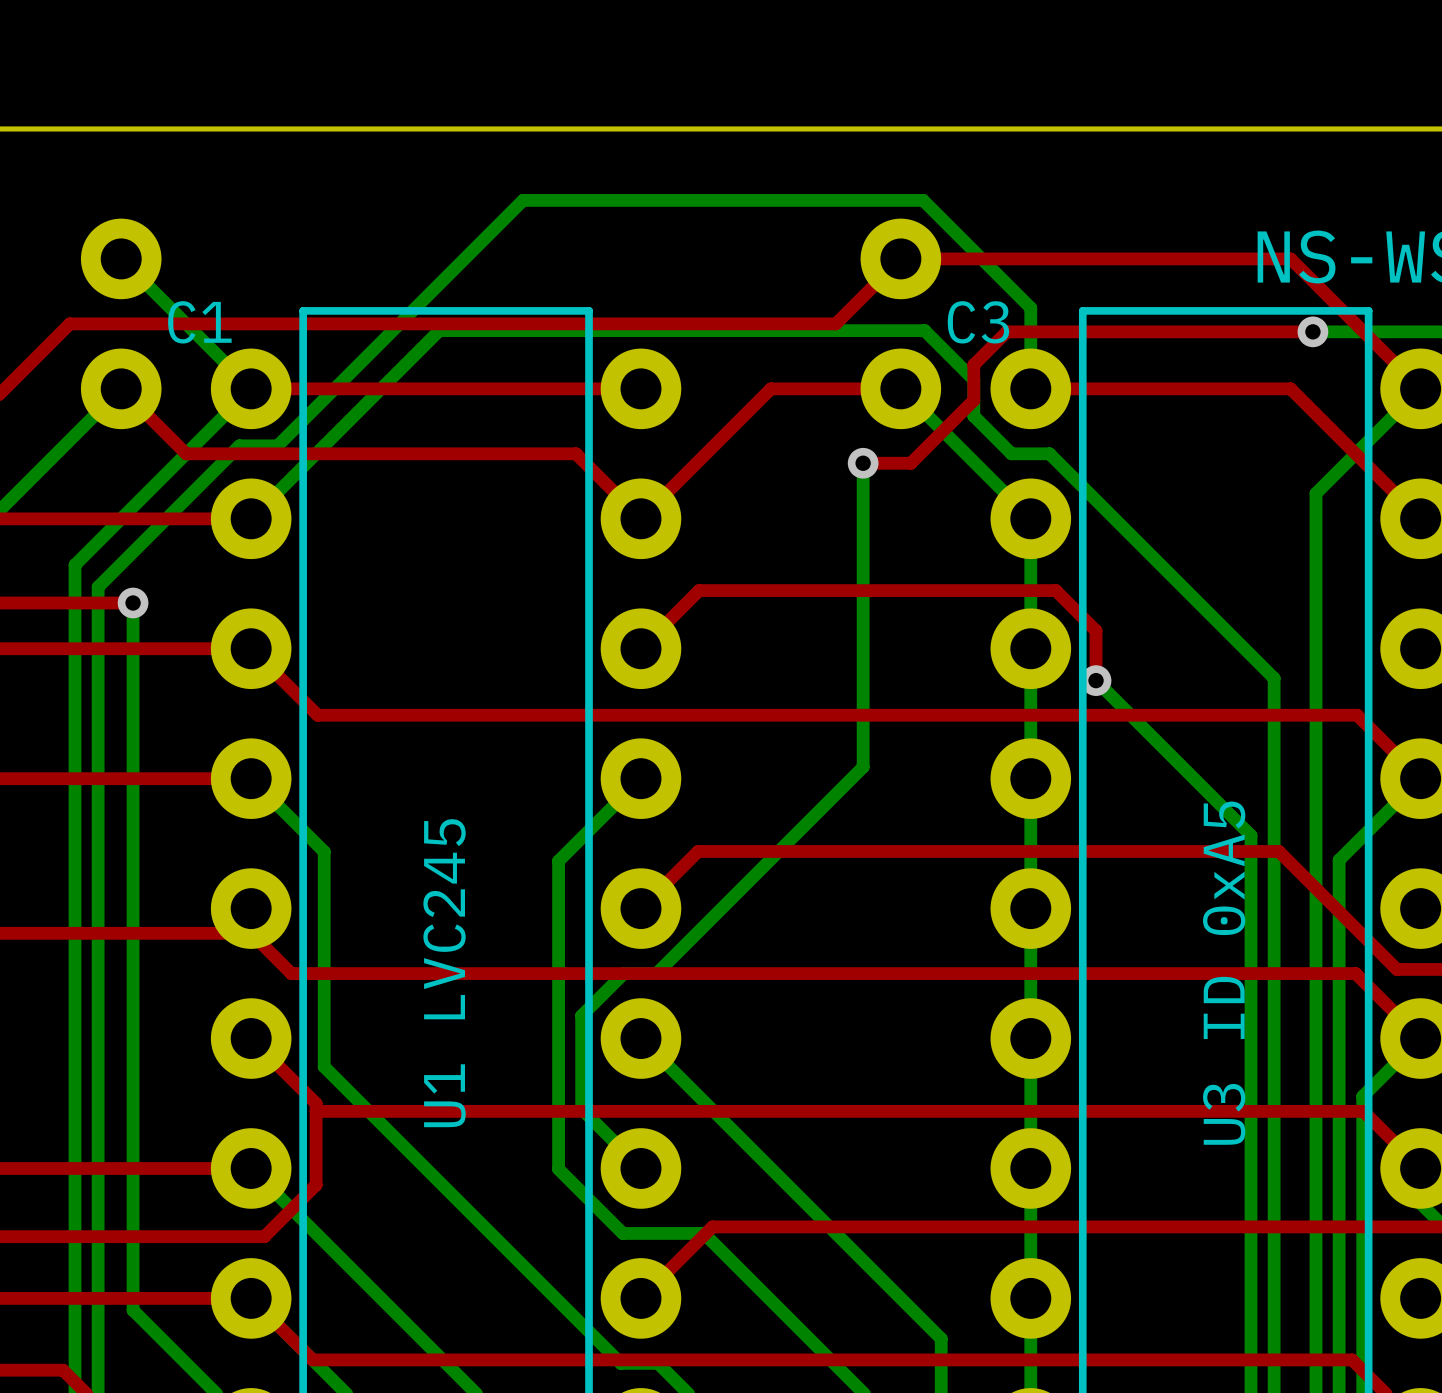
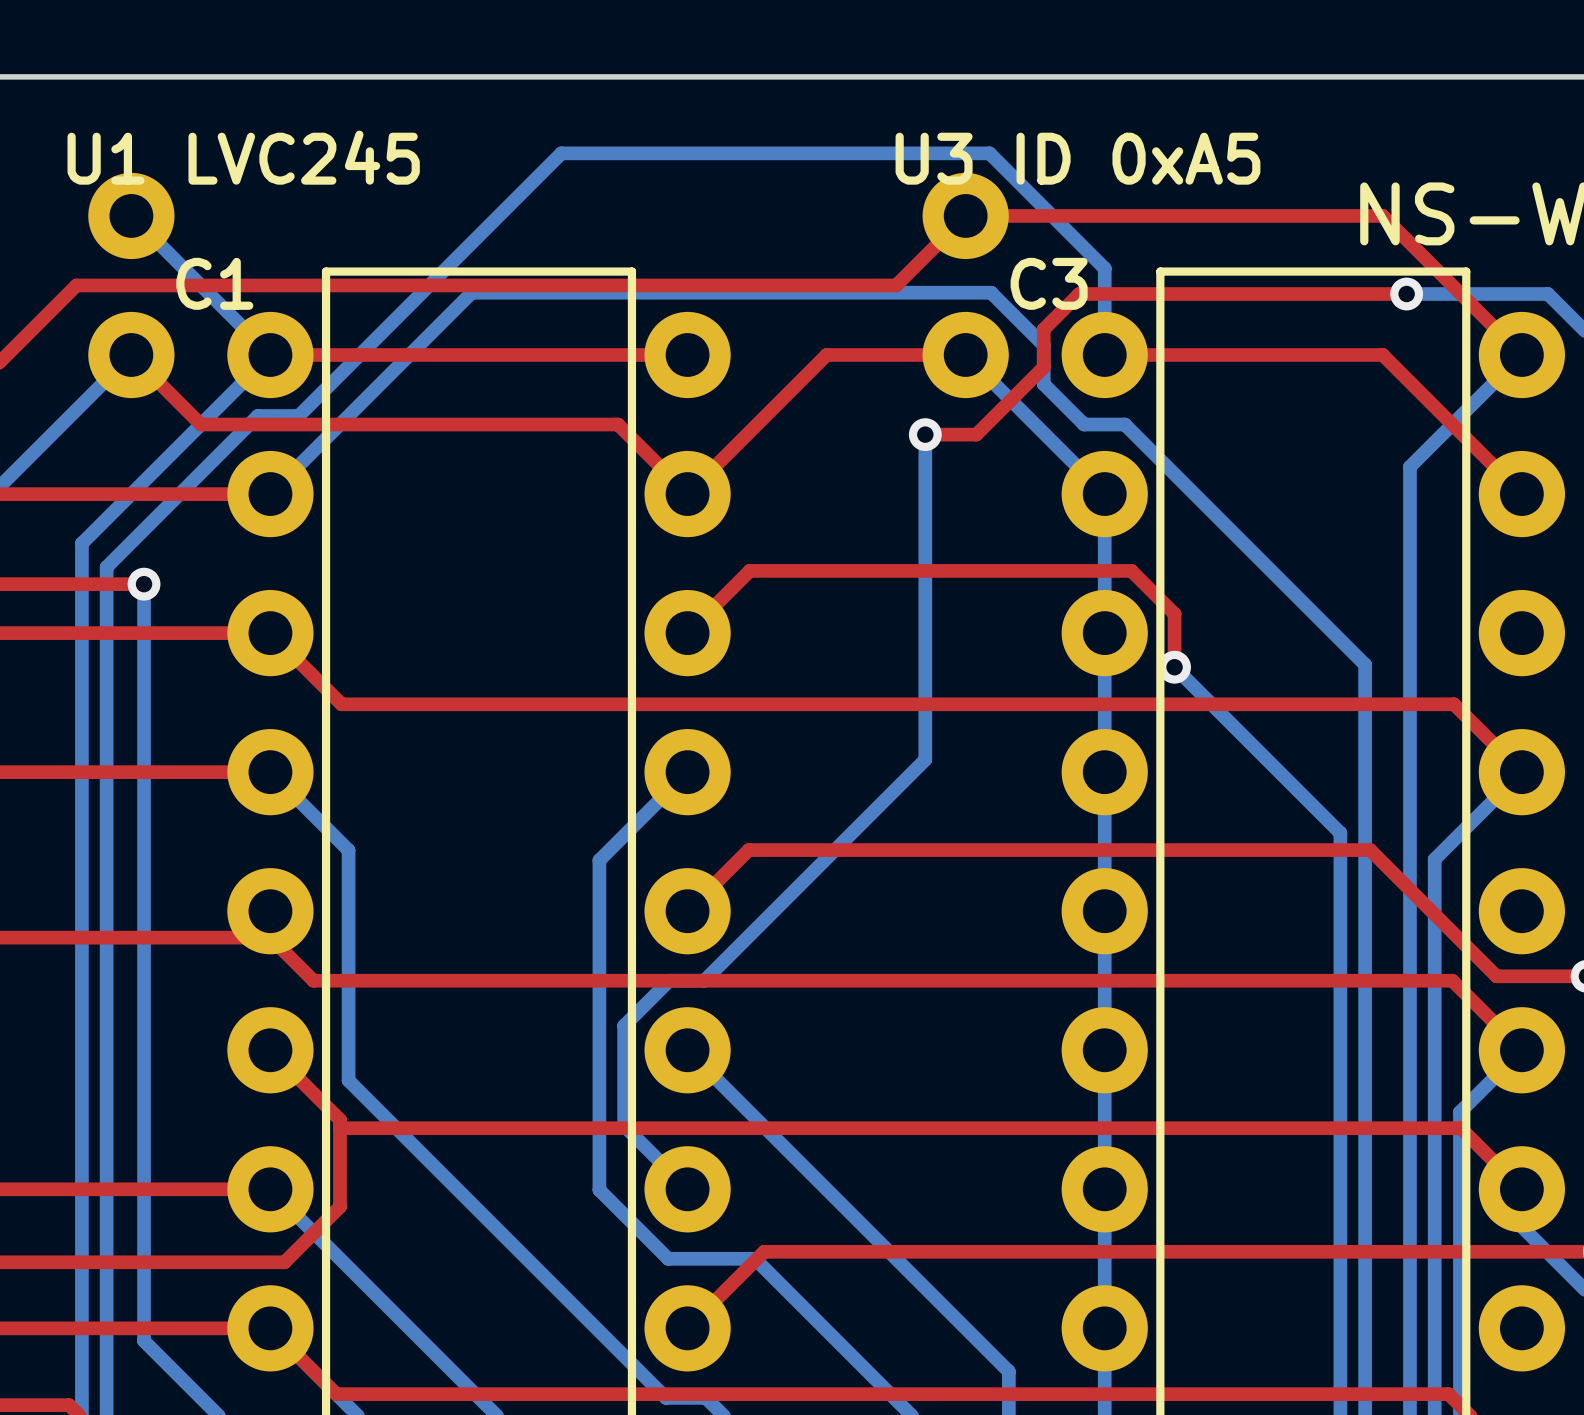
text rotation: 0° (444, 973) -> 90° clockwise (243, 157)
text position: U1 LVC245 (444, 973) -> U1 LVC245 (243, 157)
text rotation: 0° (1224, 973) -> 90° clockwise (1077, 158)
text position: U3 ID 0xA5 (1224, 973) -> U3 ID 0xA5 (1077, 158)

